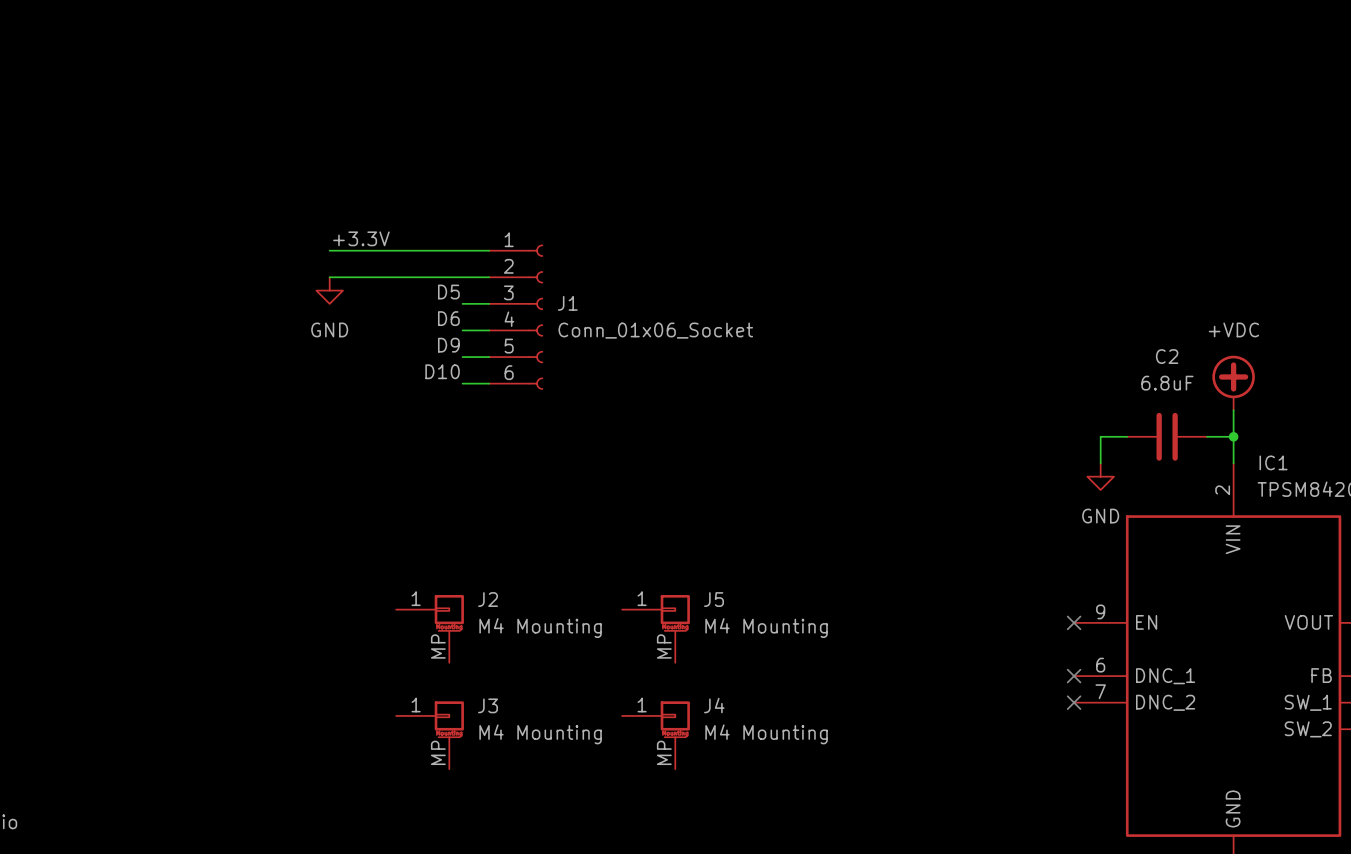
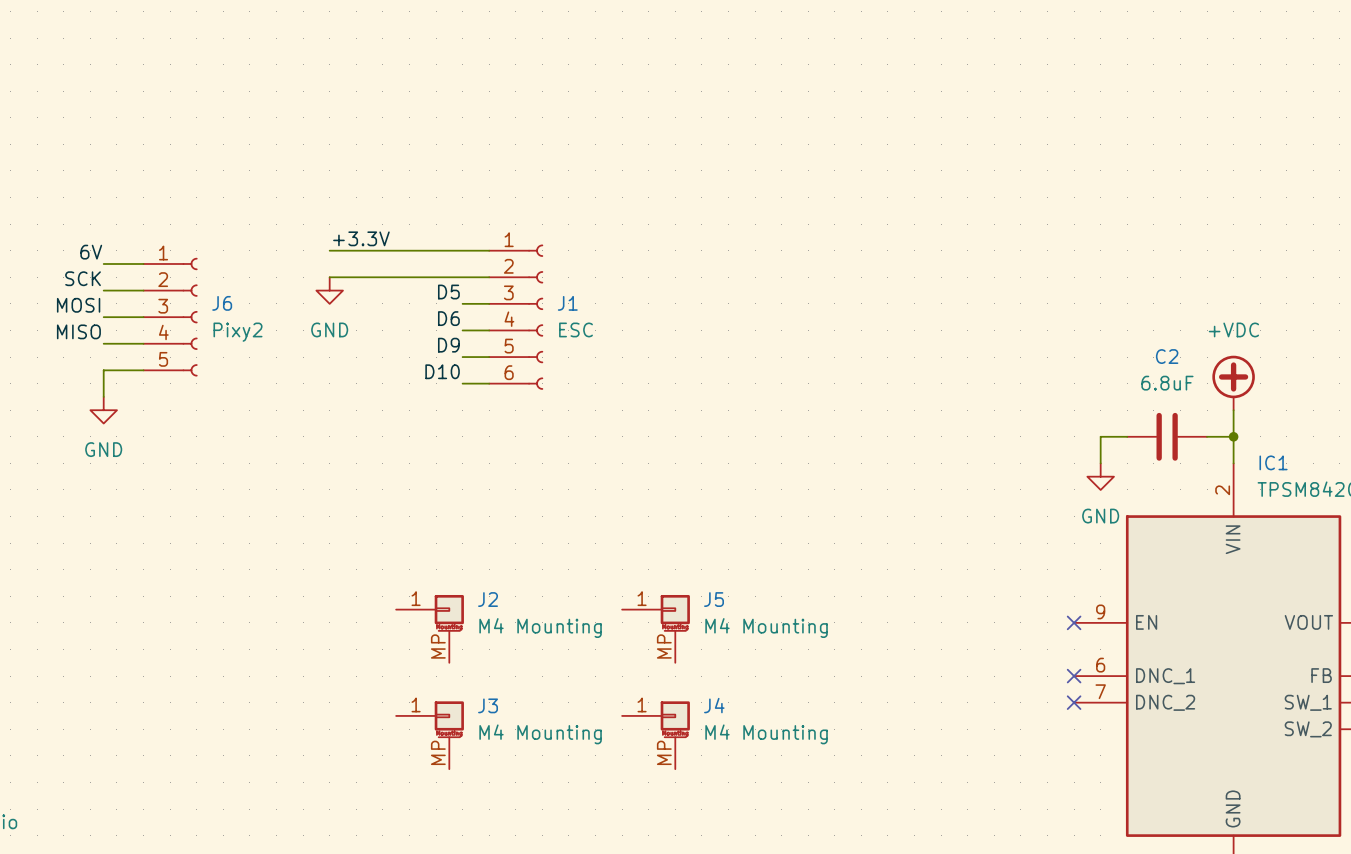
label: none -> 6V (91, 252)
wire: none -> (103, 263) (143, 263)
label: none -> SCK (83, 278)
wire: none -> (103, 290) (143, 290)
label: none -> MOSI (78, 305)
wire: none -> (103, 317) (143, 317)
J6: none -> Pixy2 (170, 317)
J1 value: Conn_01x06_Socket (655, 330) -> ESC (576, 329)
label: none -> MISO (78, 331)
wire: none -> (103, 343) (143, 343)
wire: none -> (143, 370) (103, 370) (103, 396)
power symbol: none -> GND (103, 410)

